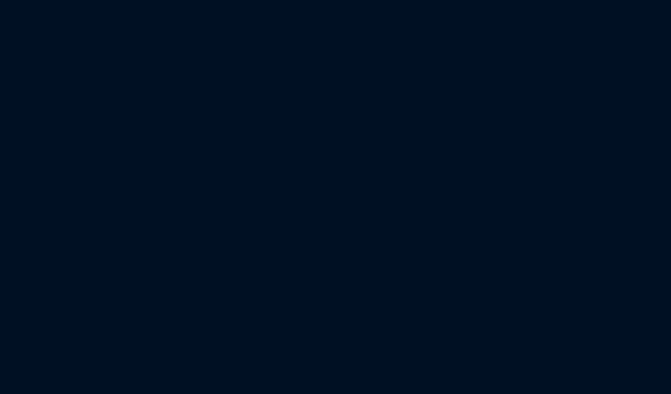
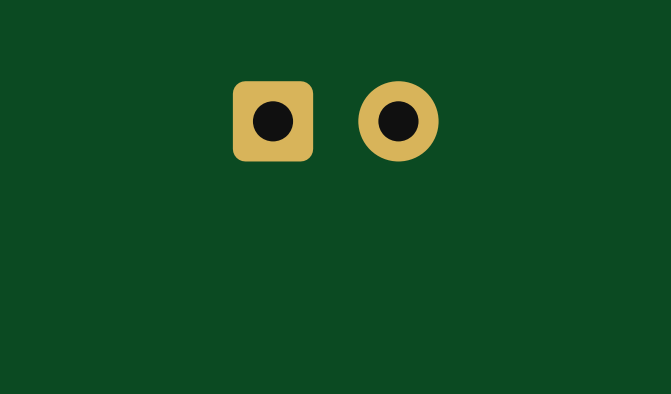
part: none -> (335, 121)

